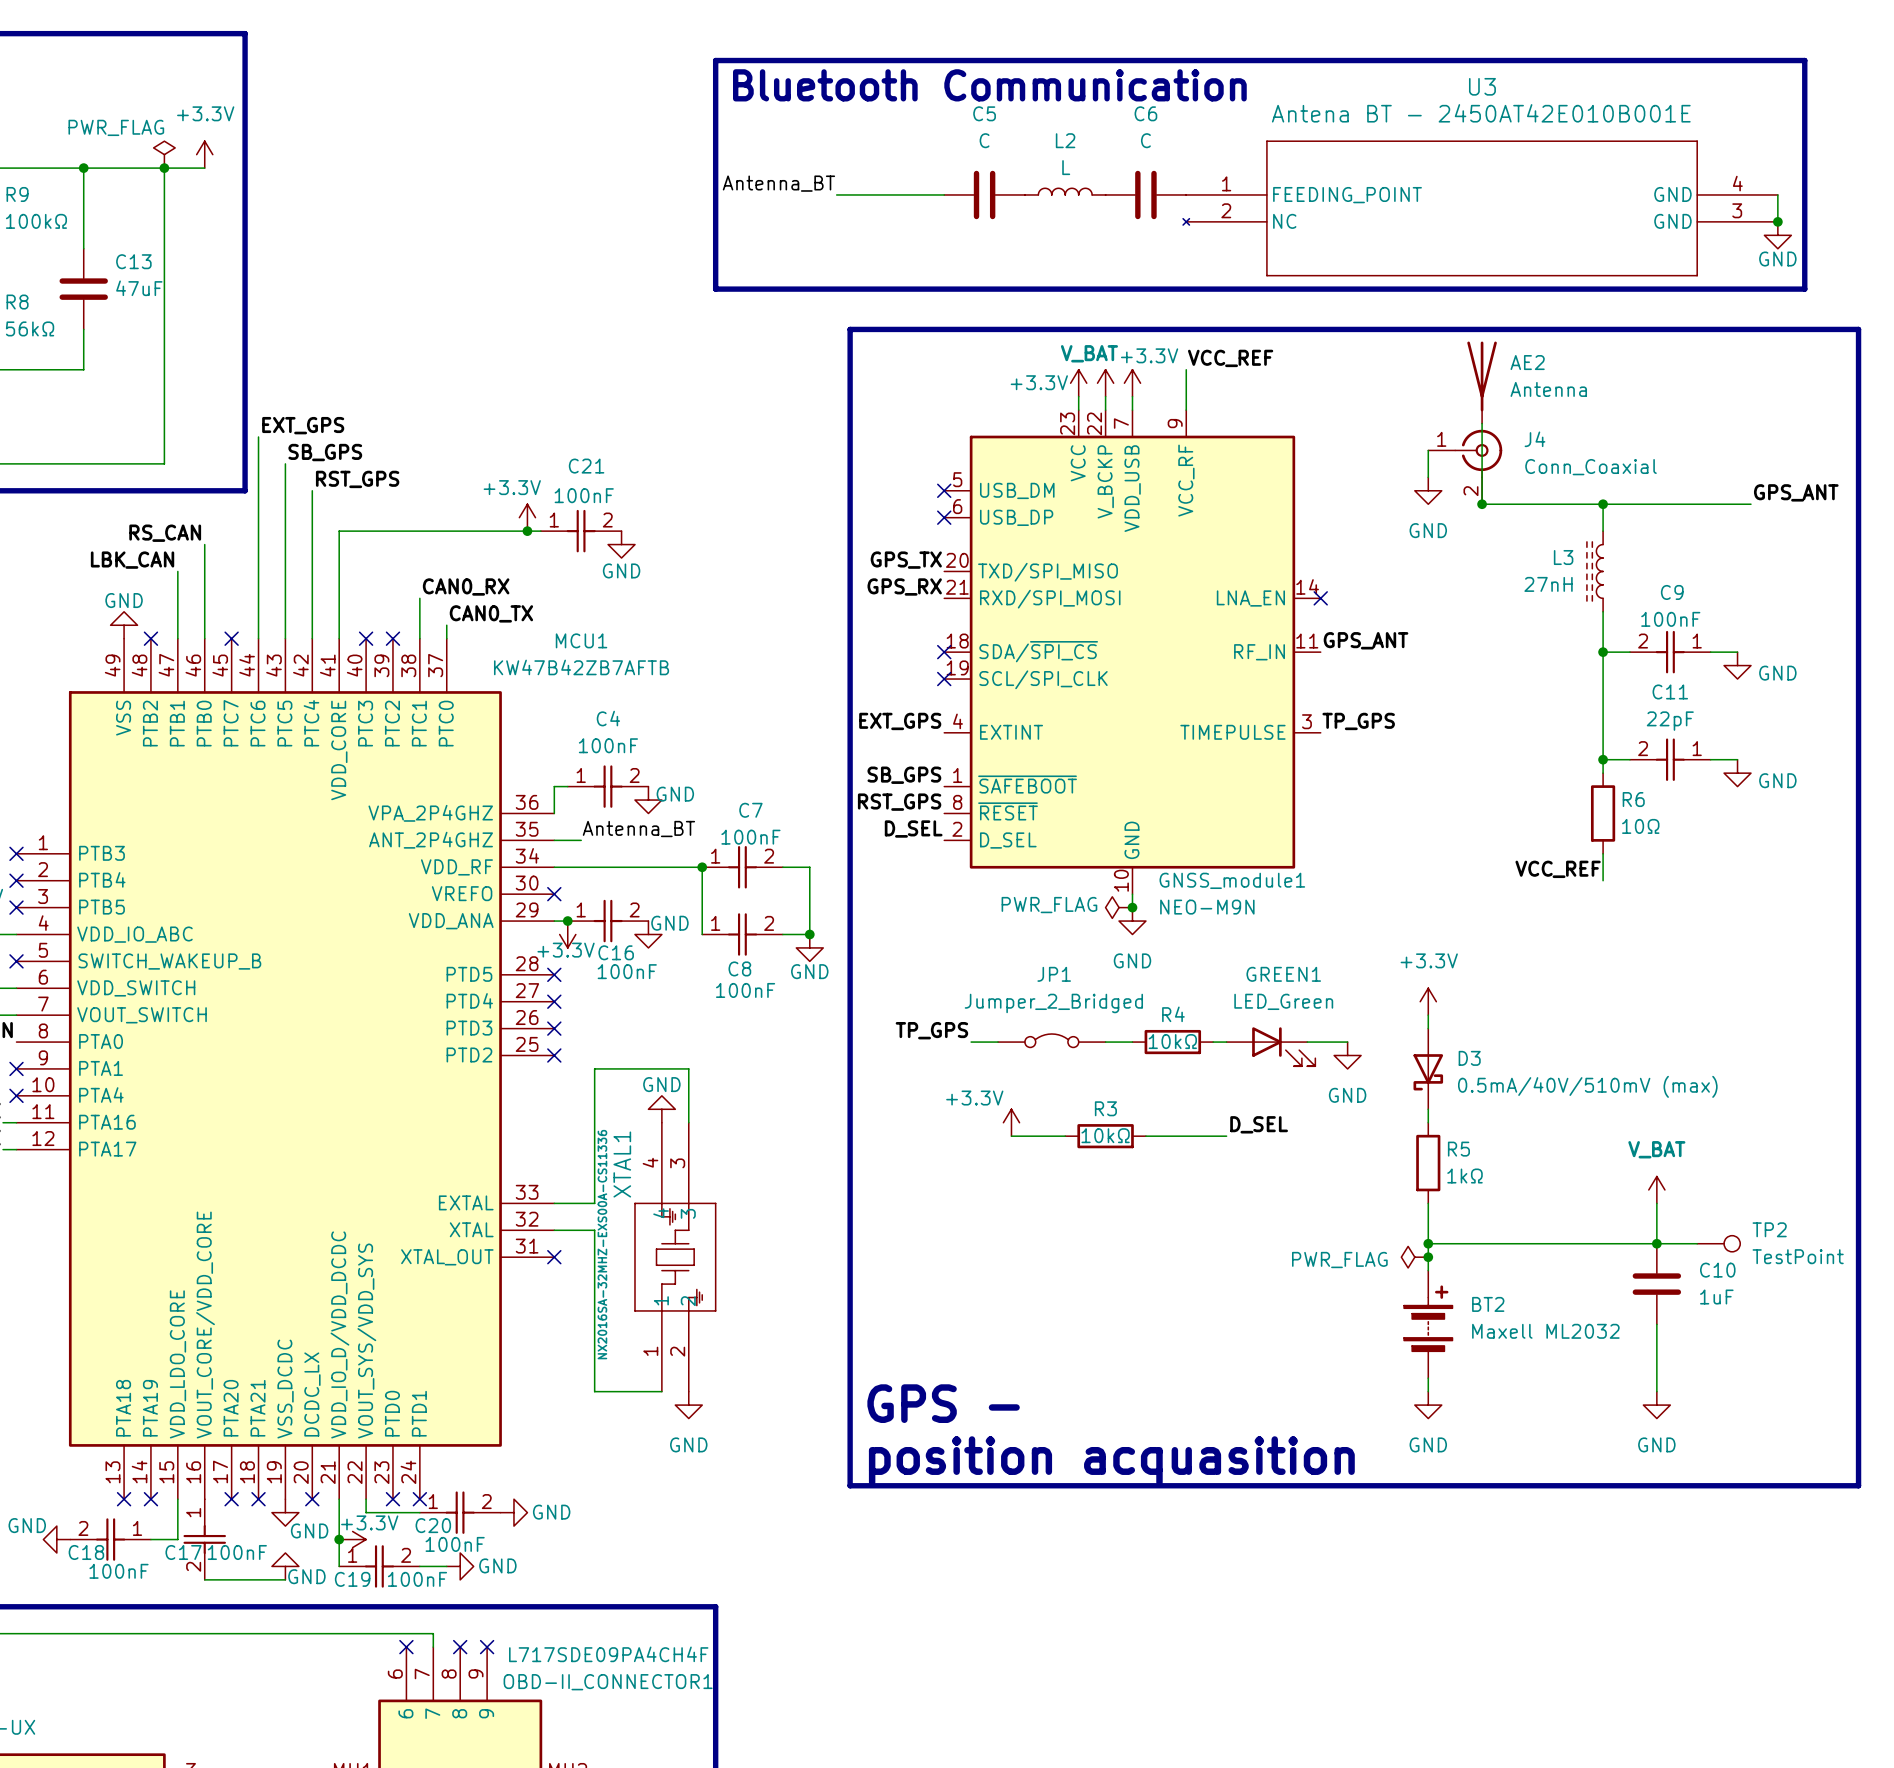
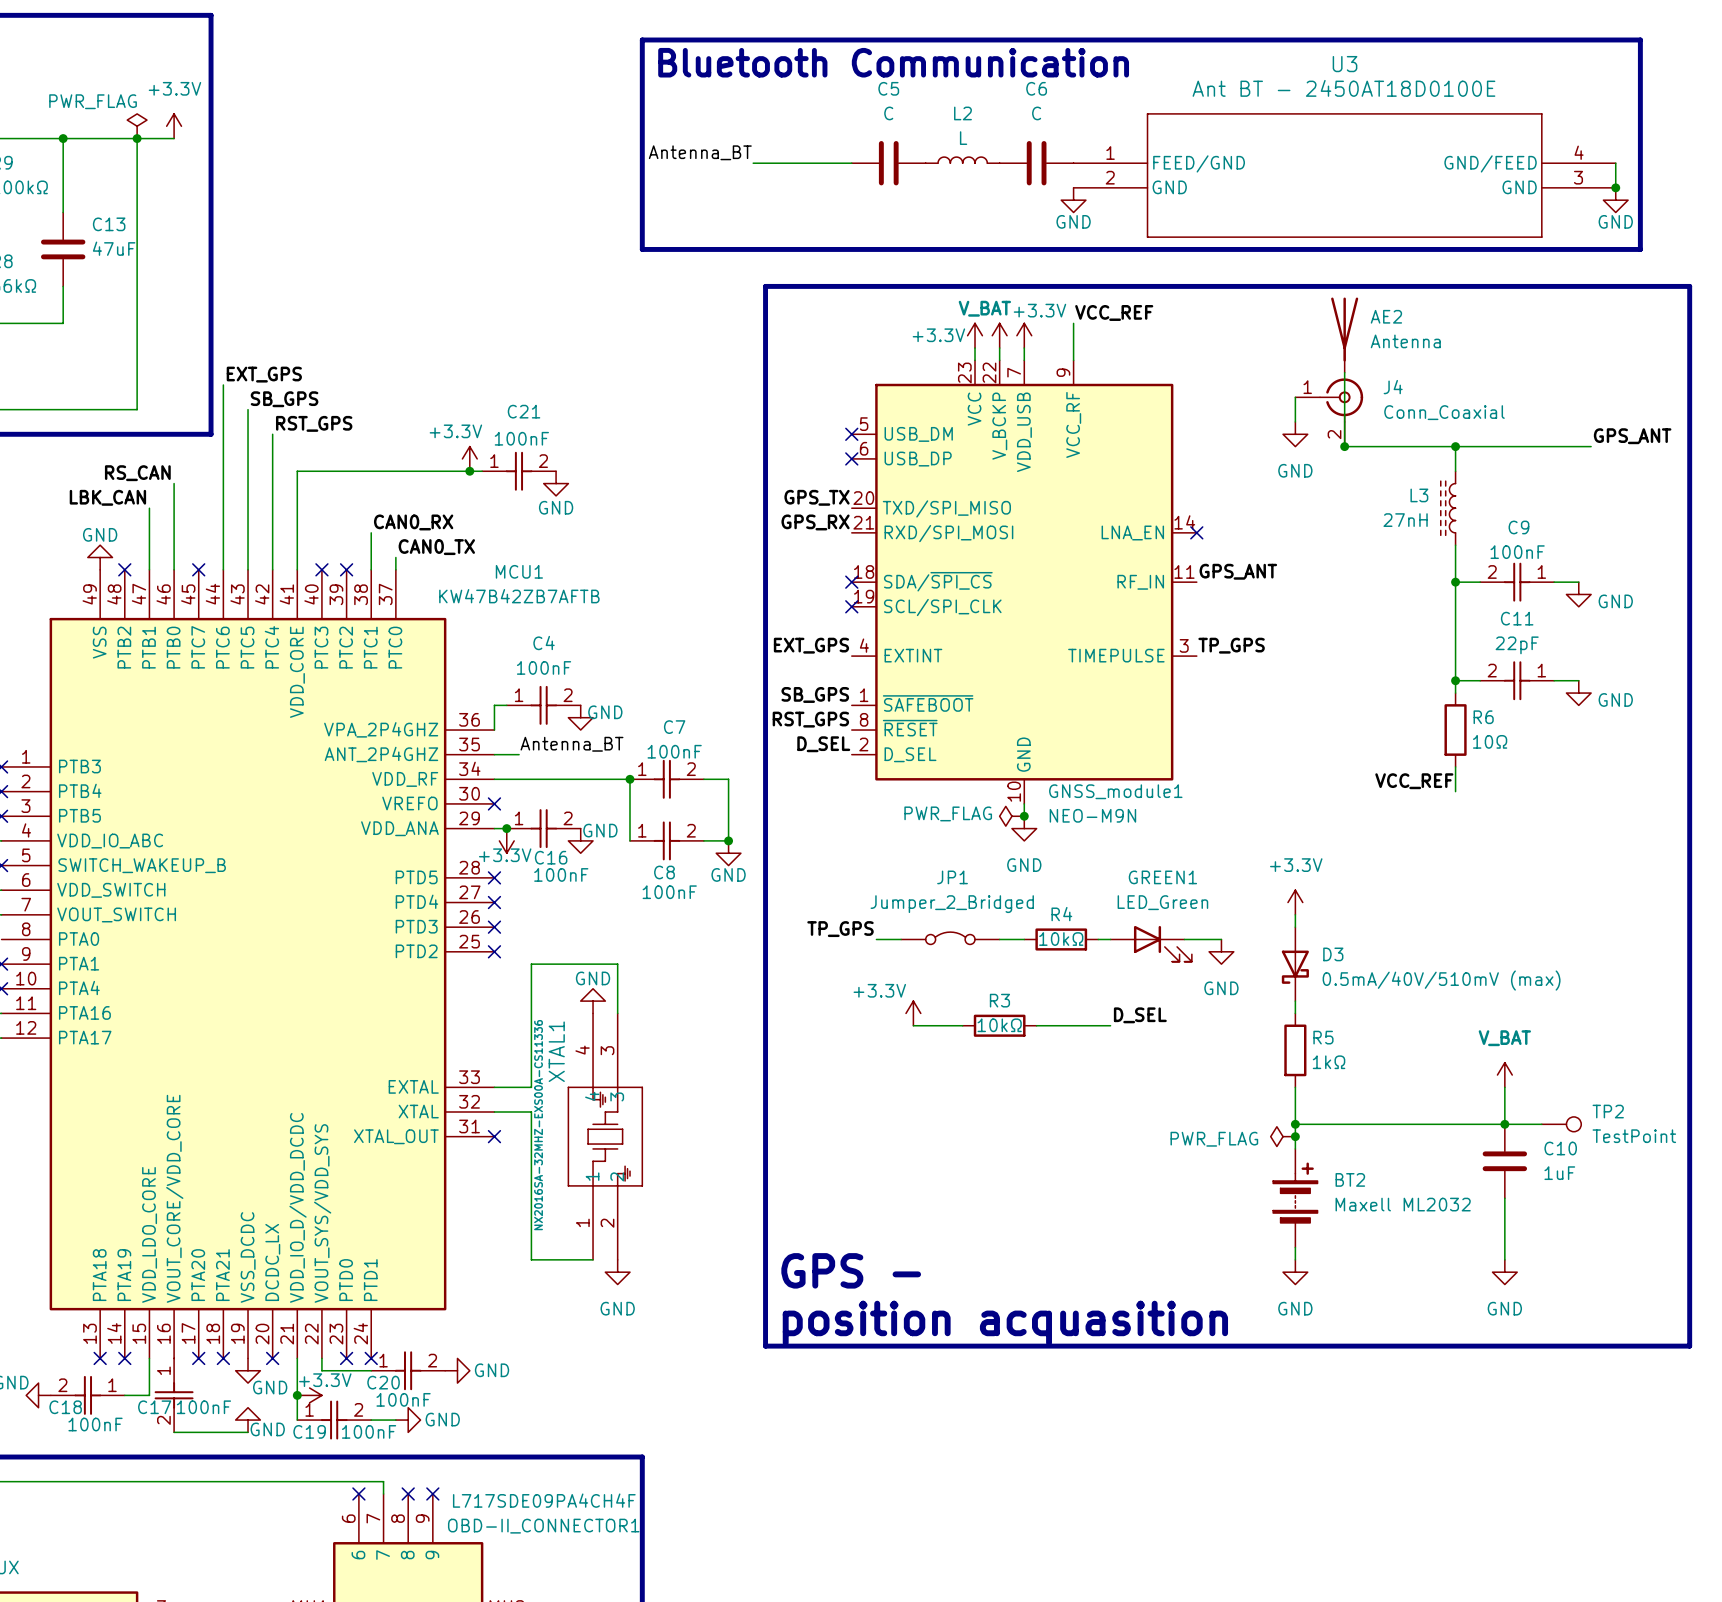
U3 value: Antena BT - 2450AT42E010B001E (1481, 113) -> Ant BT - 2450AT18D0100E (1343, 88)
U3 symbol: [1183, 140, 1778, 277] -> [1073, 113, 1616, 238]
power symbol: none -> GND (1073, 200)

